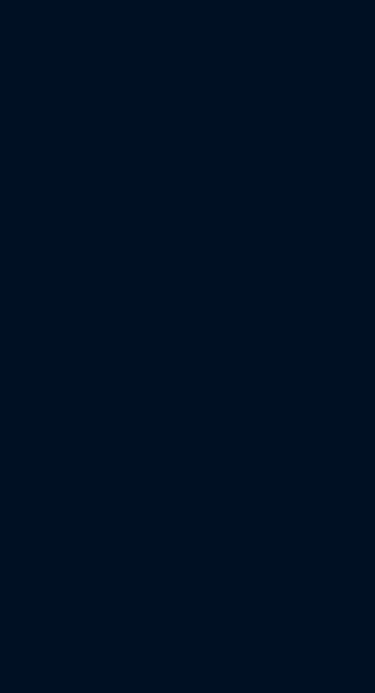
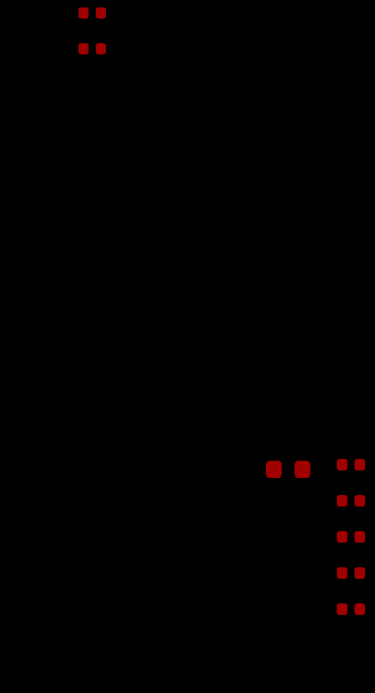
part: none -> (92, 12)
part: none -> (92, 48)
part: none -> (350, 464)
part: none -> (288, 469)
part: none -> (350, 500)
part: none -> (350, 536)
part: none -> (350, 573)
part: none -> (350, 609)

